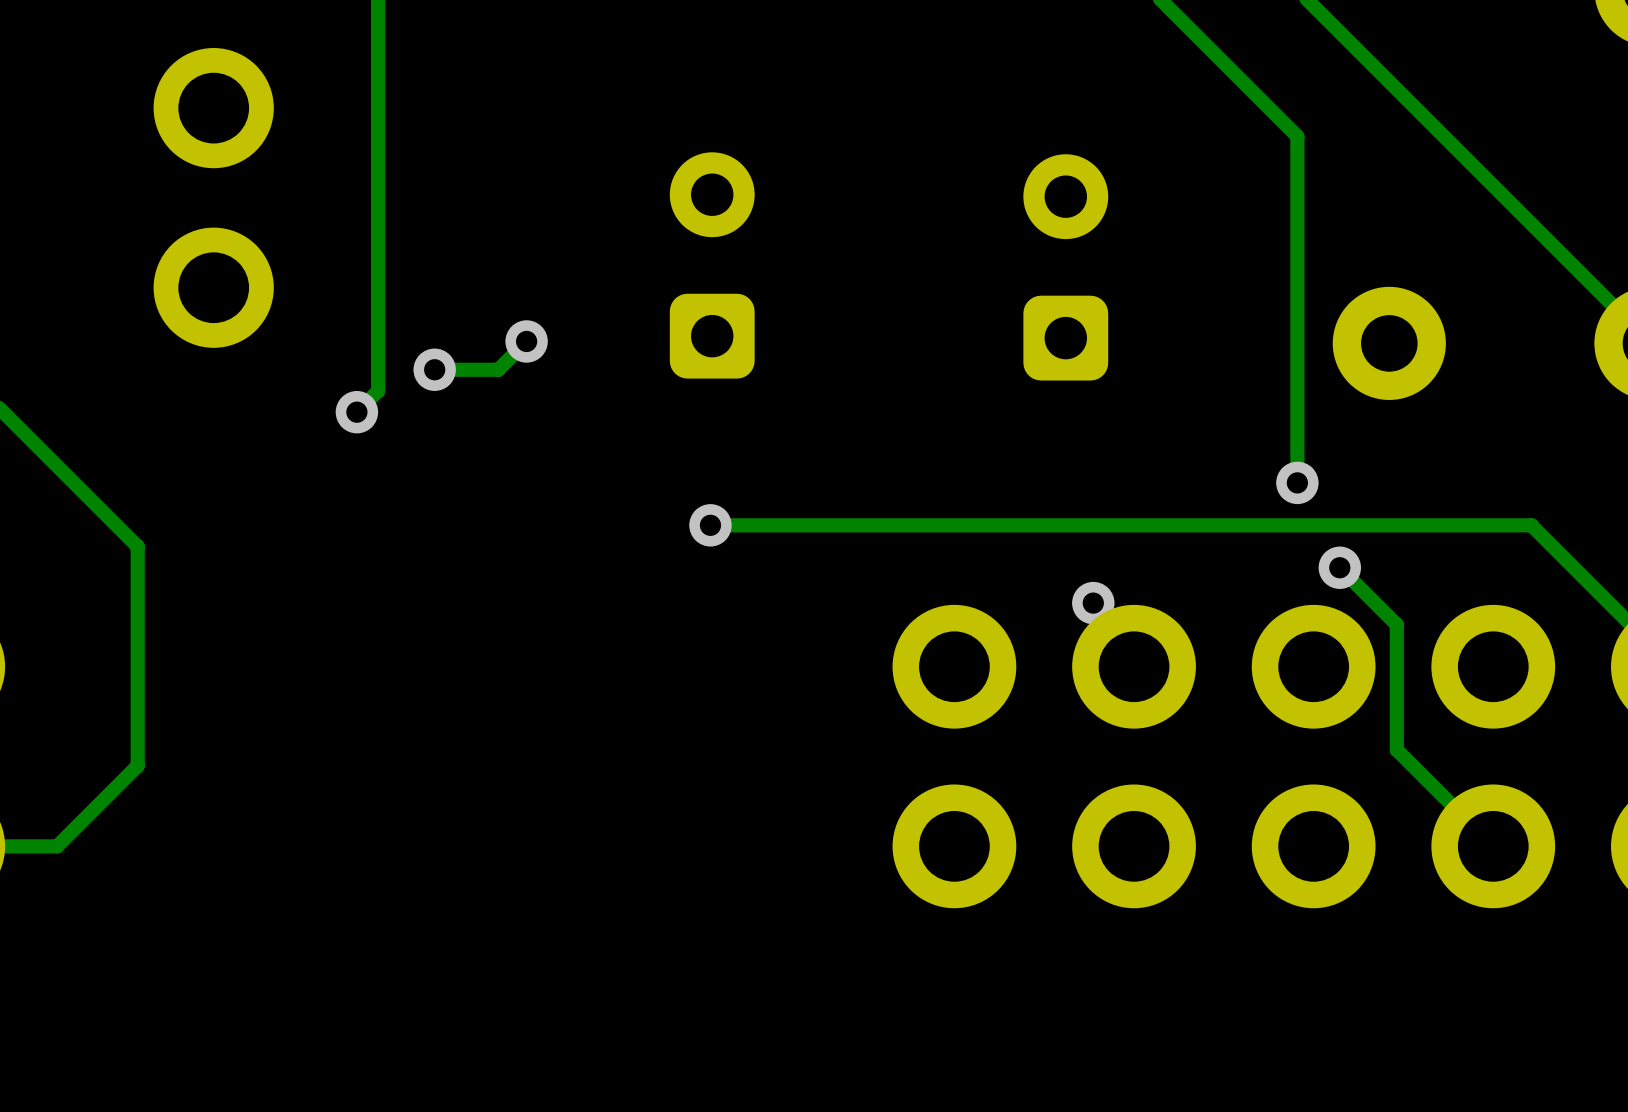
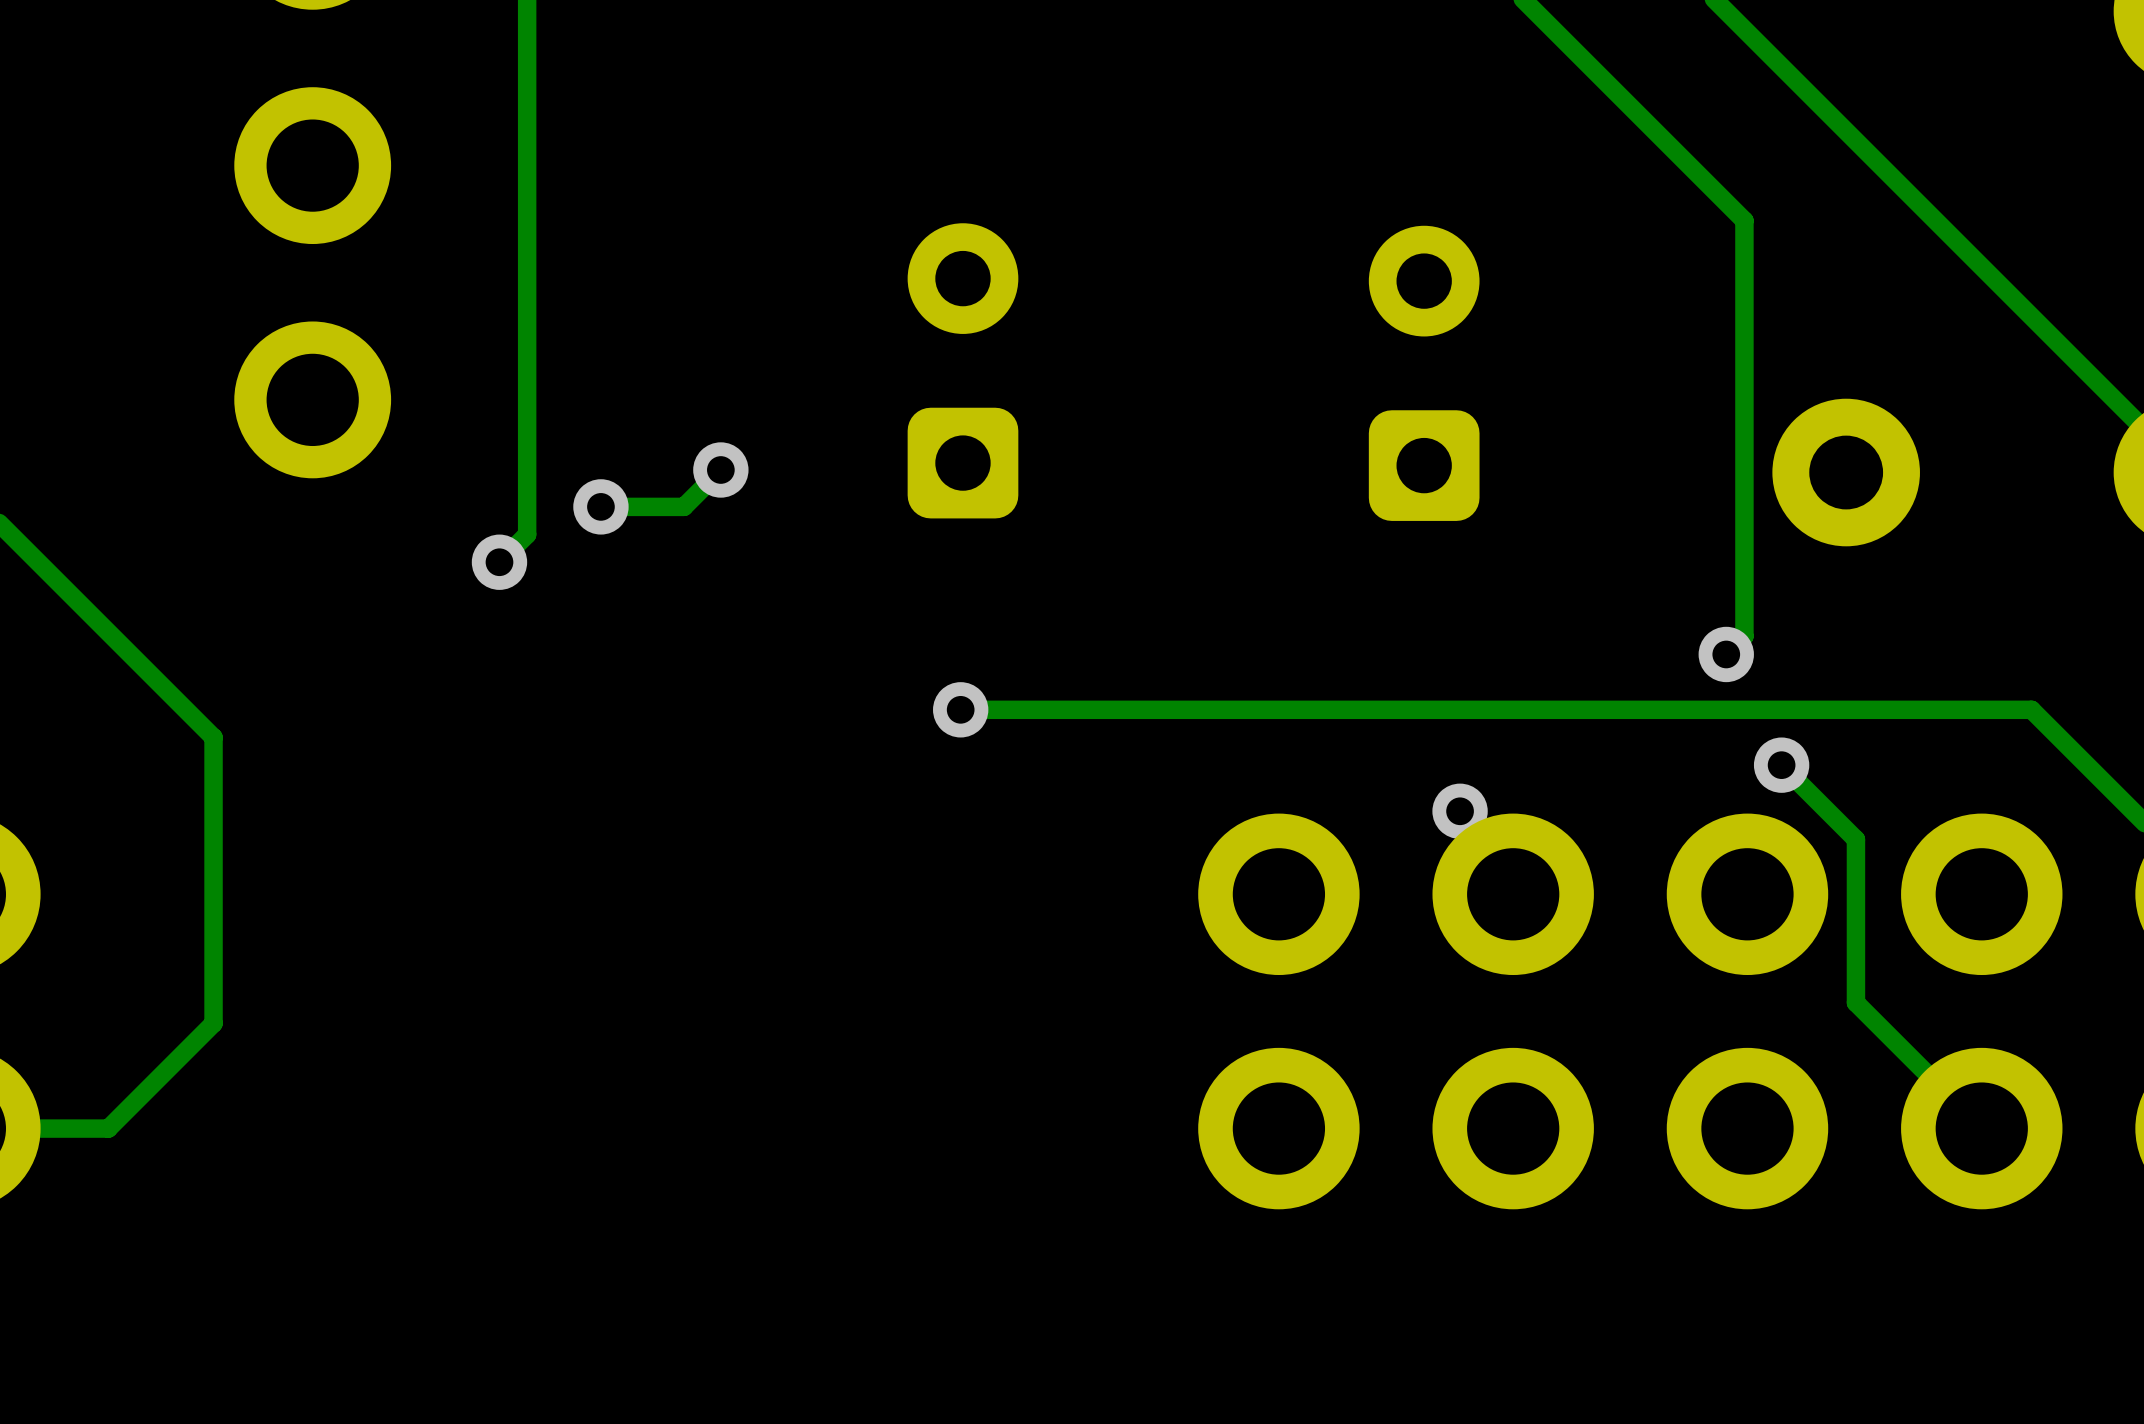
track: (1297, 136) (1297, 482) -> (1726, 202) (1744, 220) (1744, 636) (1726, 654)

